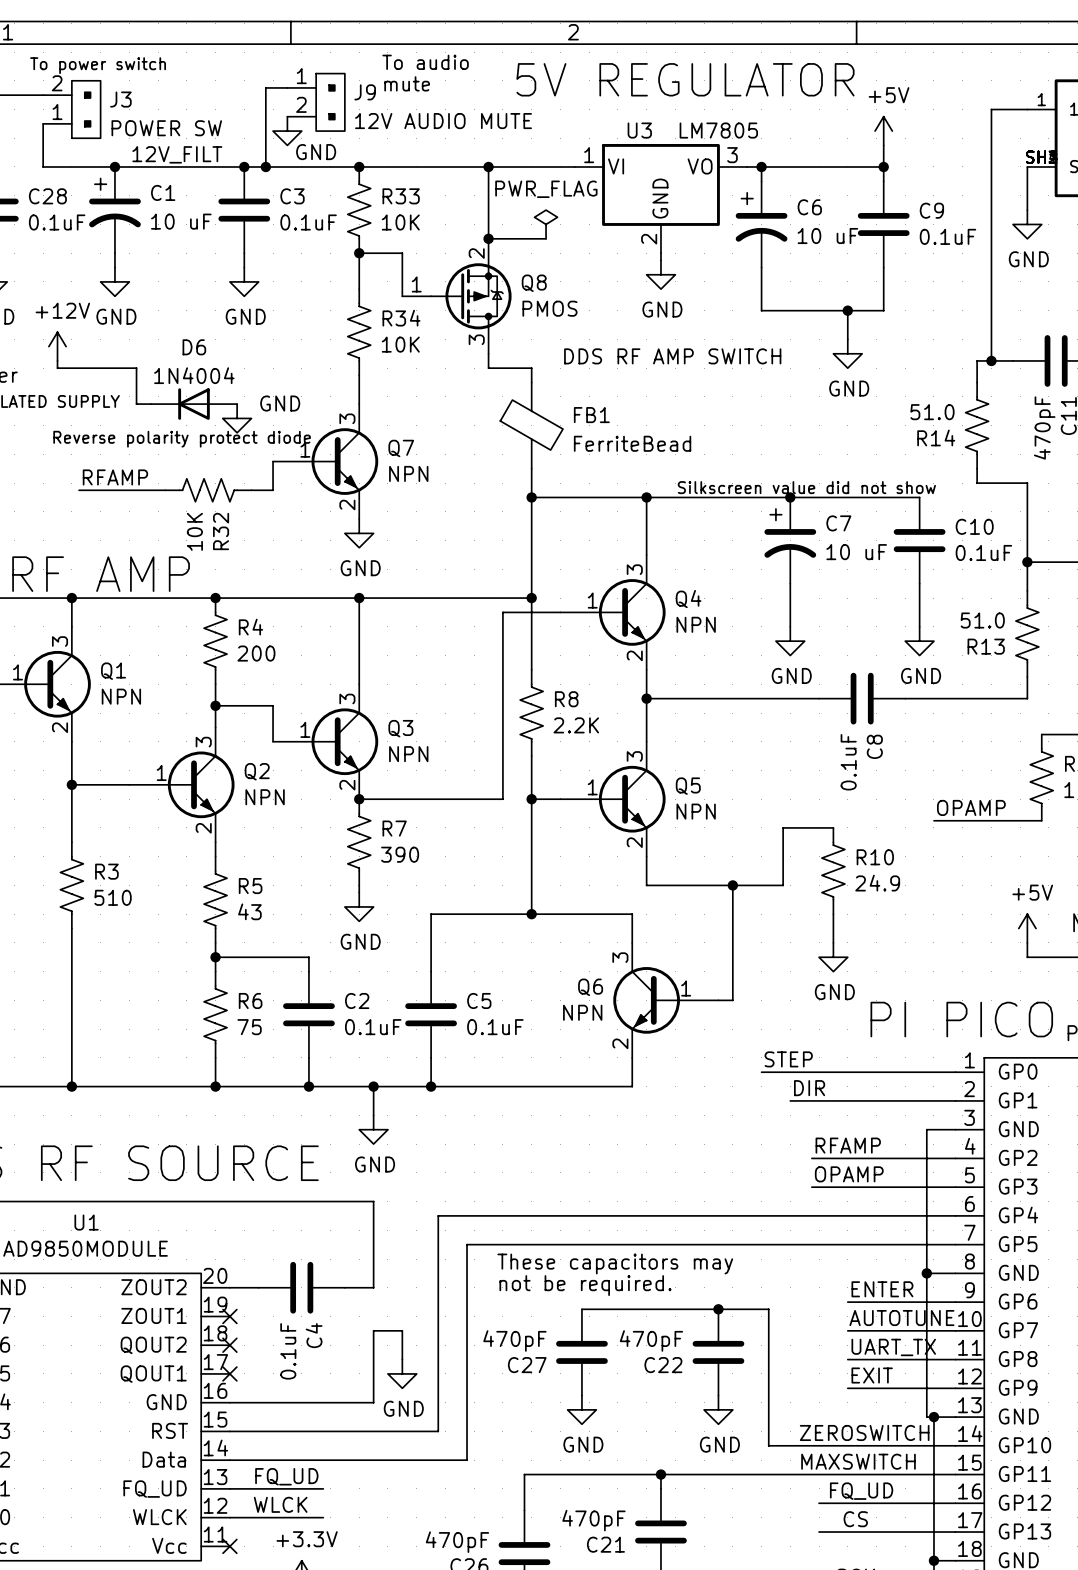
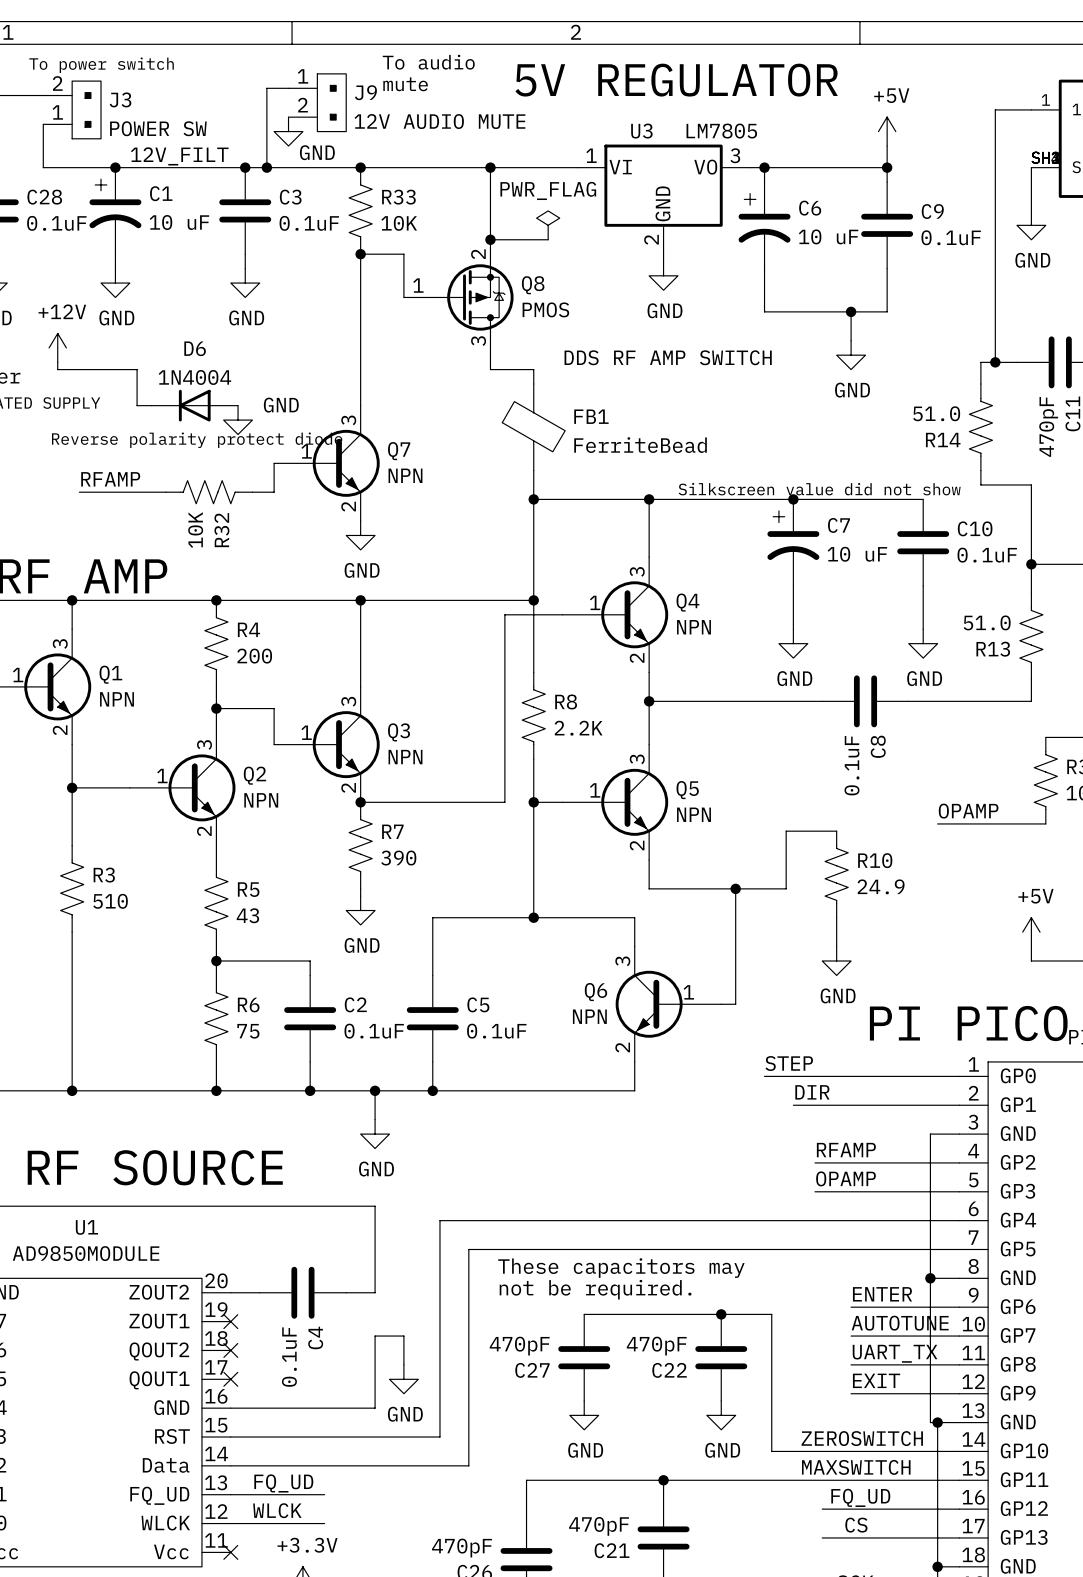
wire: none -> (360, 290) (360, 376)
R34: 10K (359, 332) -> none

